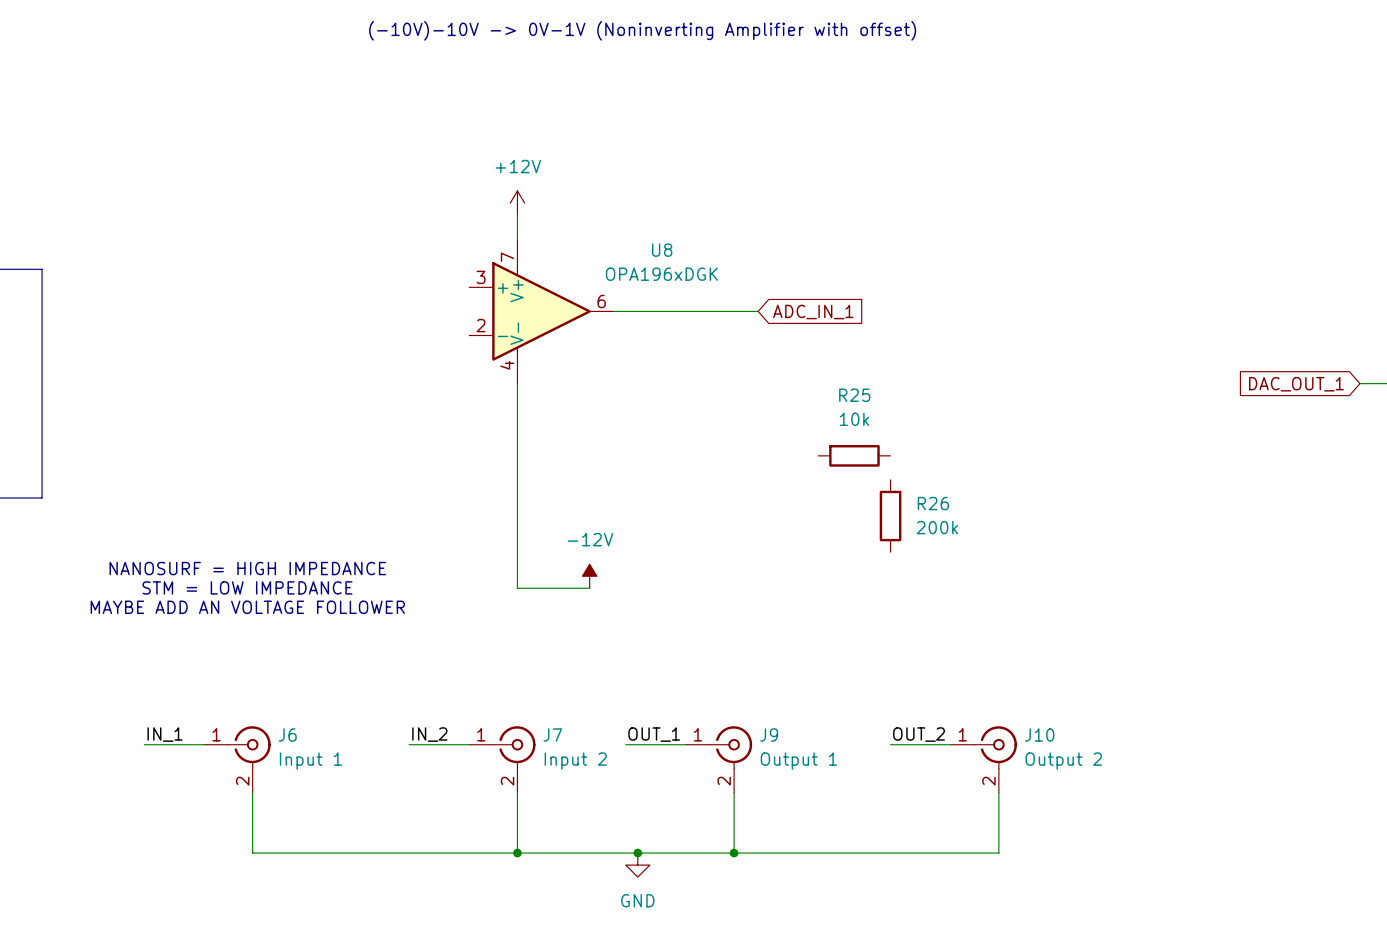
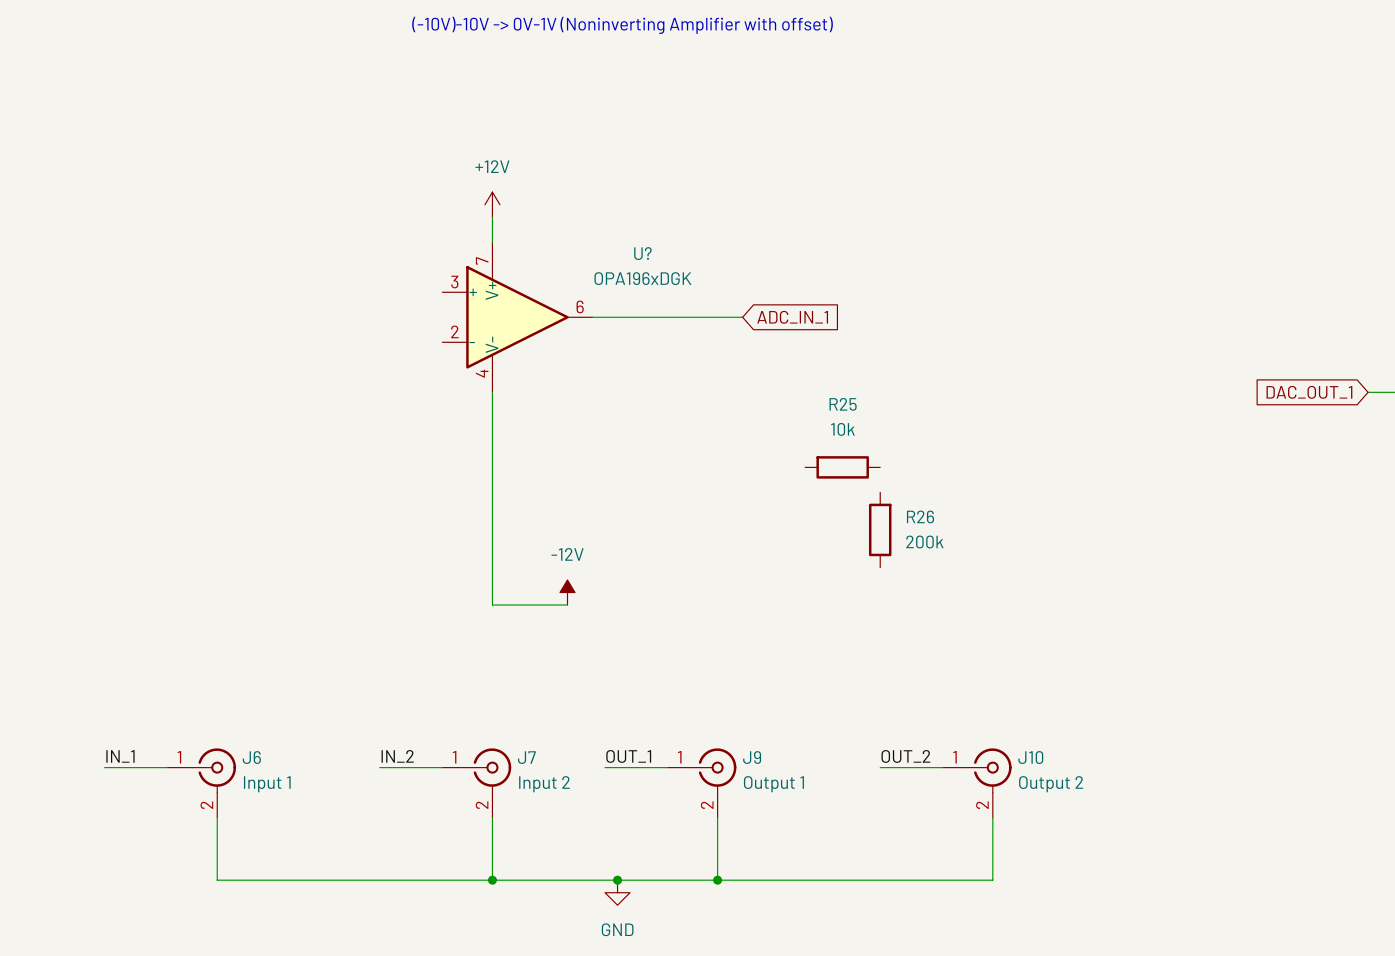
U8 name: U8 (662, 250) -> U? (642, 253)
text: NANOSURF = HIGH IMPEDANCE (247, 568) -> none
text: STM = LOW IMPEDANCE (247, 587) -> none
text: MAYBE ADD AN VOLTAGE FOLLOWER (247, 607) -> none

